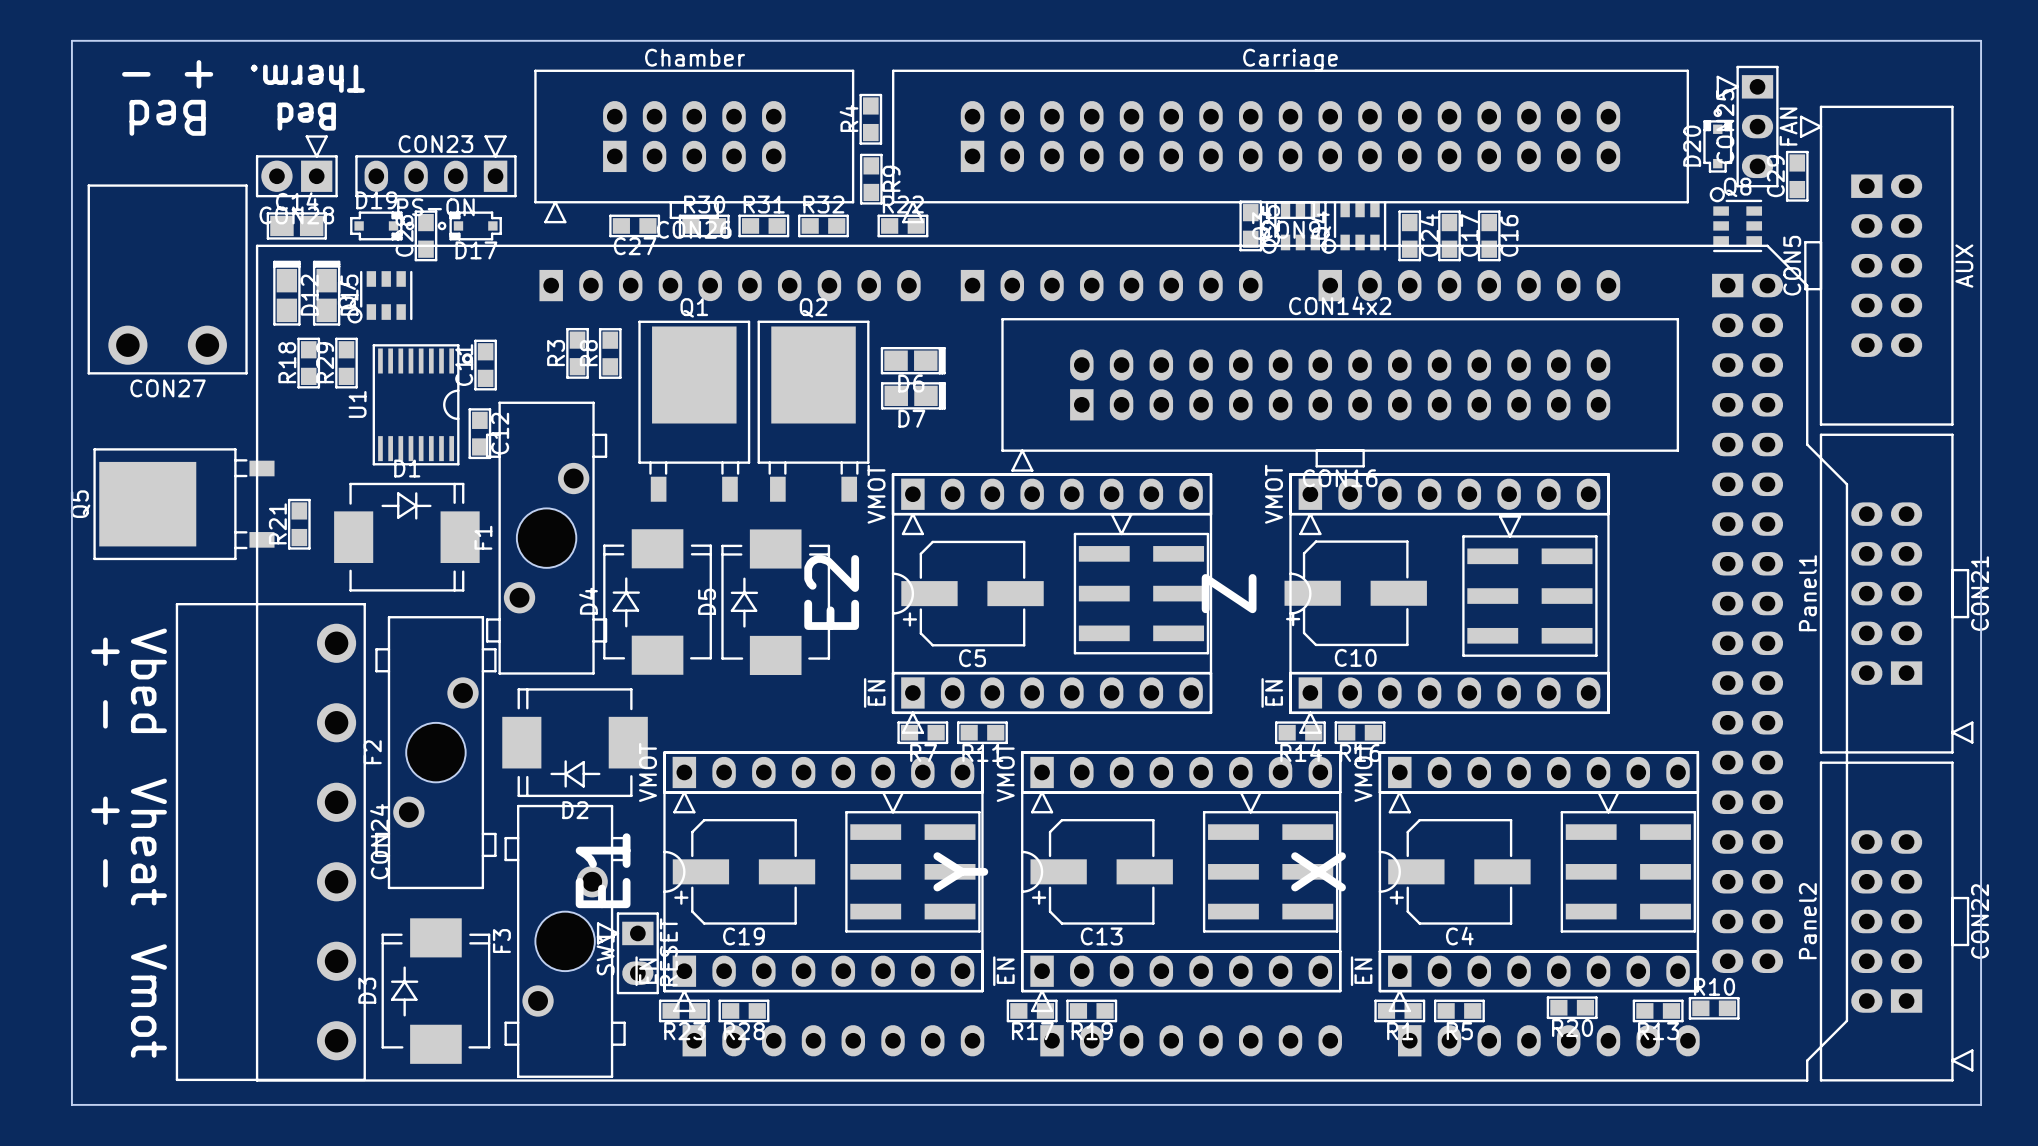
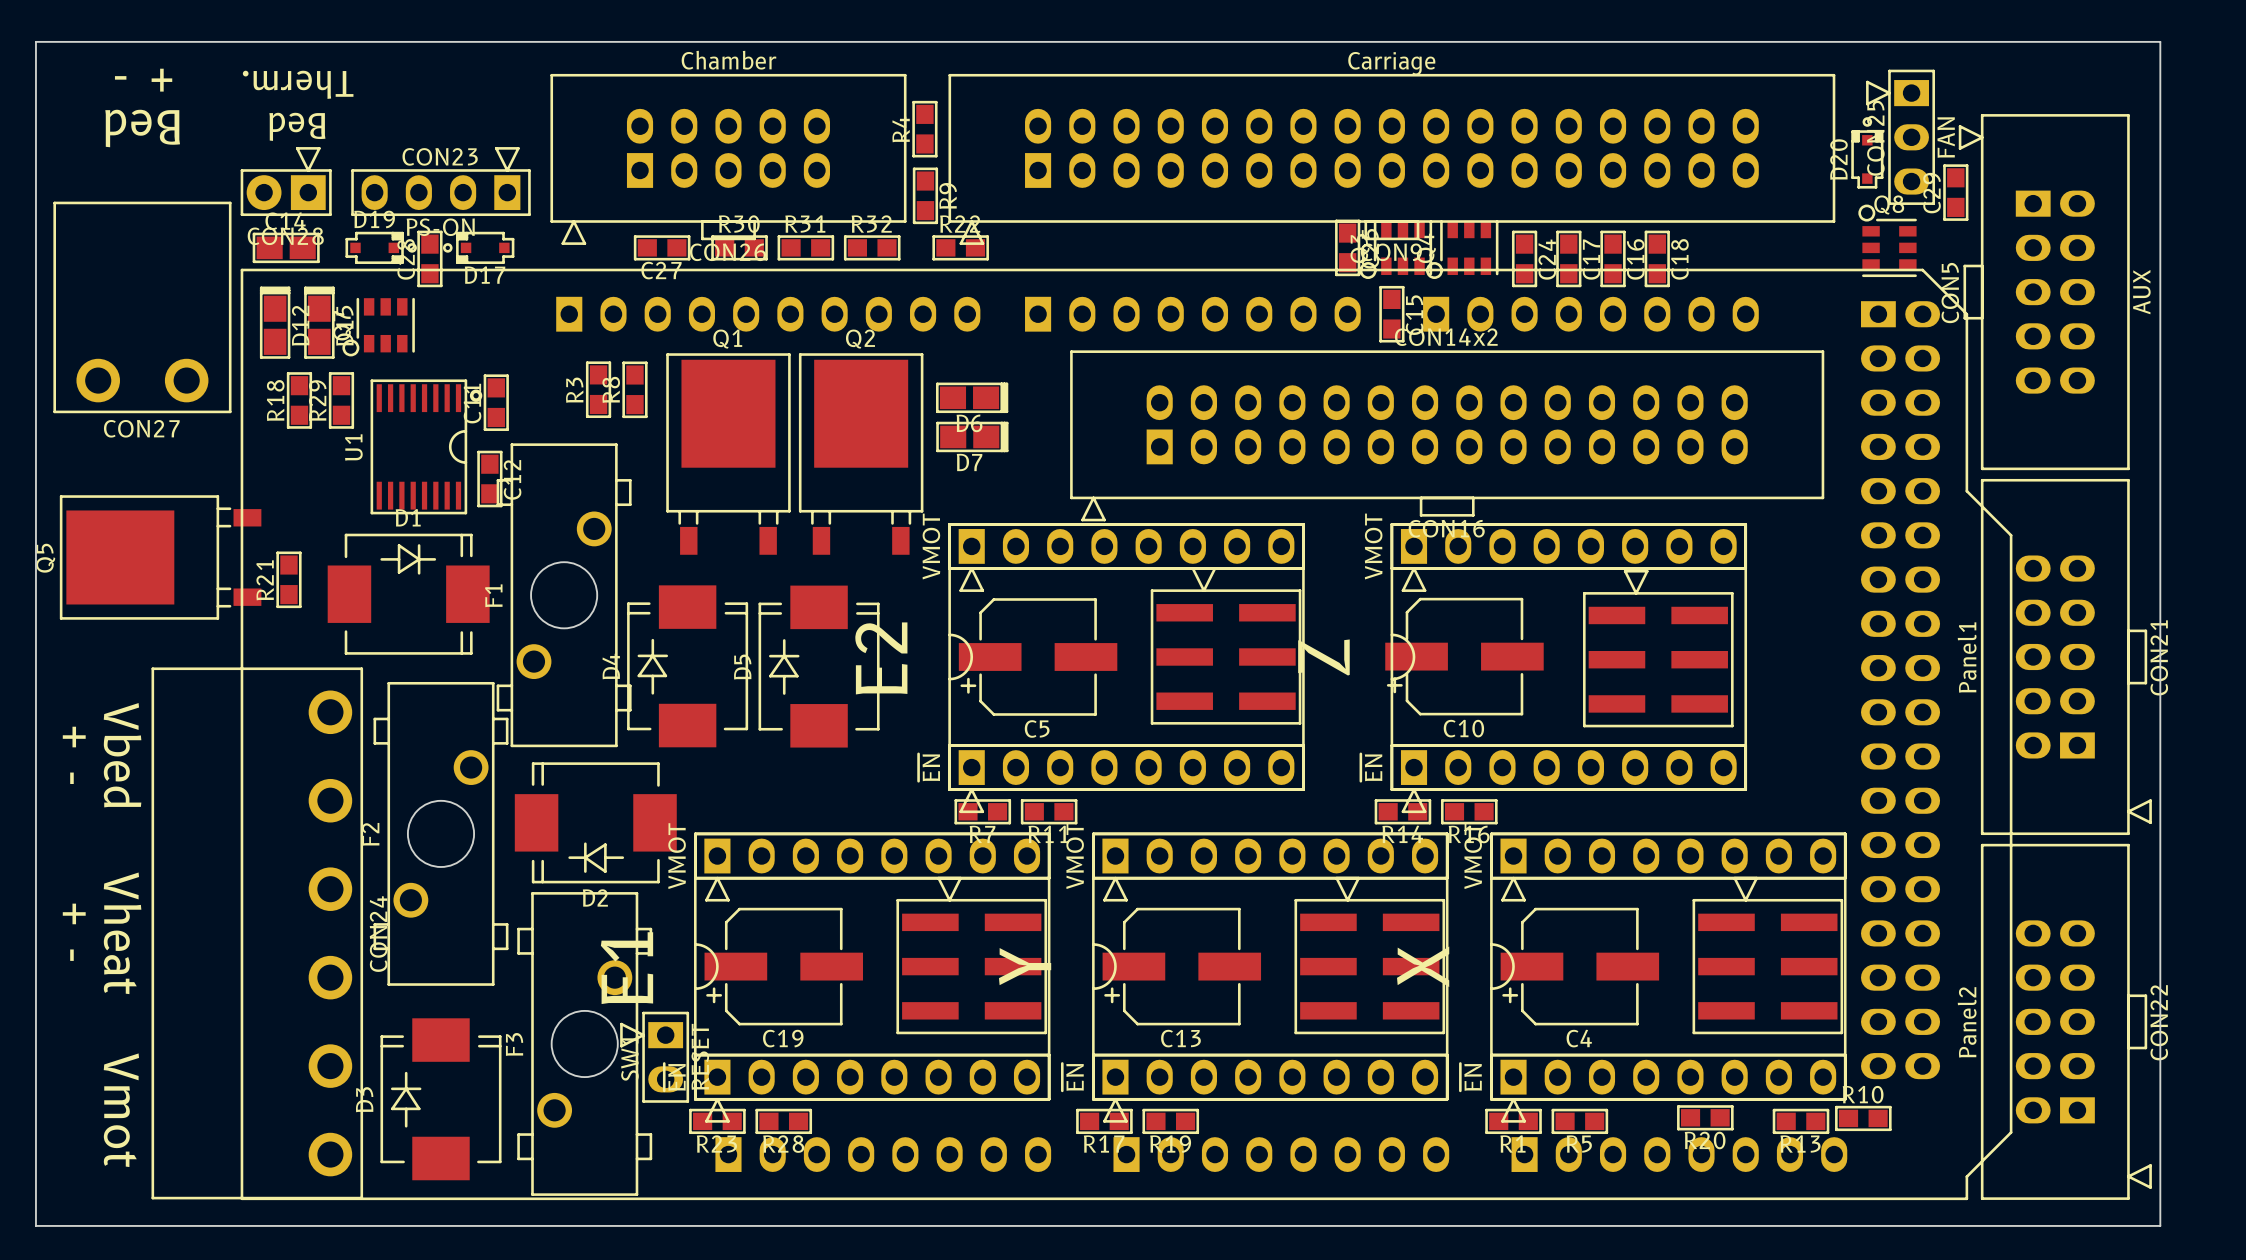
C18: none -> (1657, 258)
C15: none -> (1391, 314)

